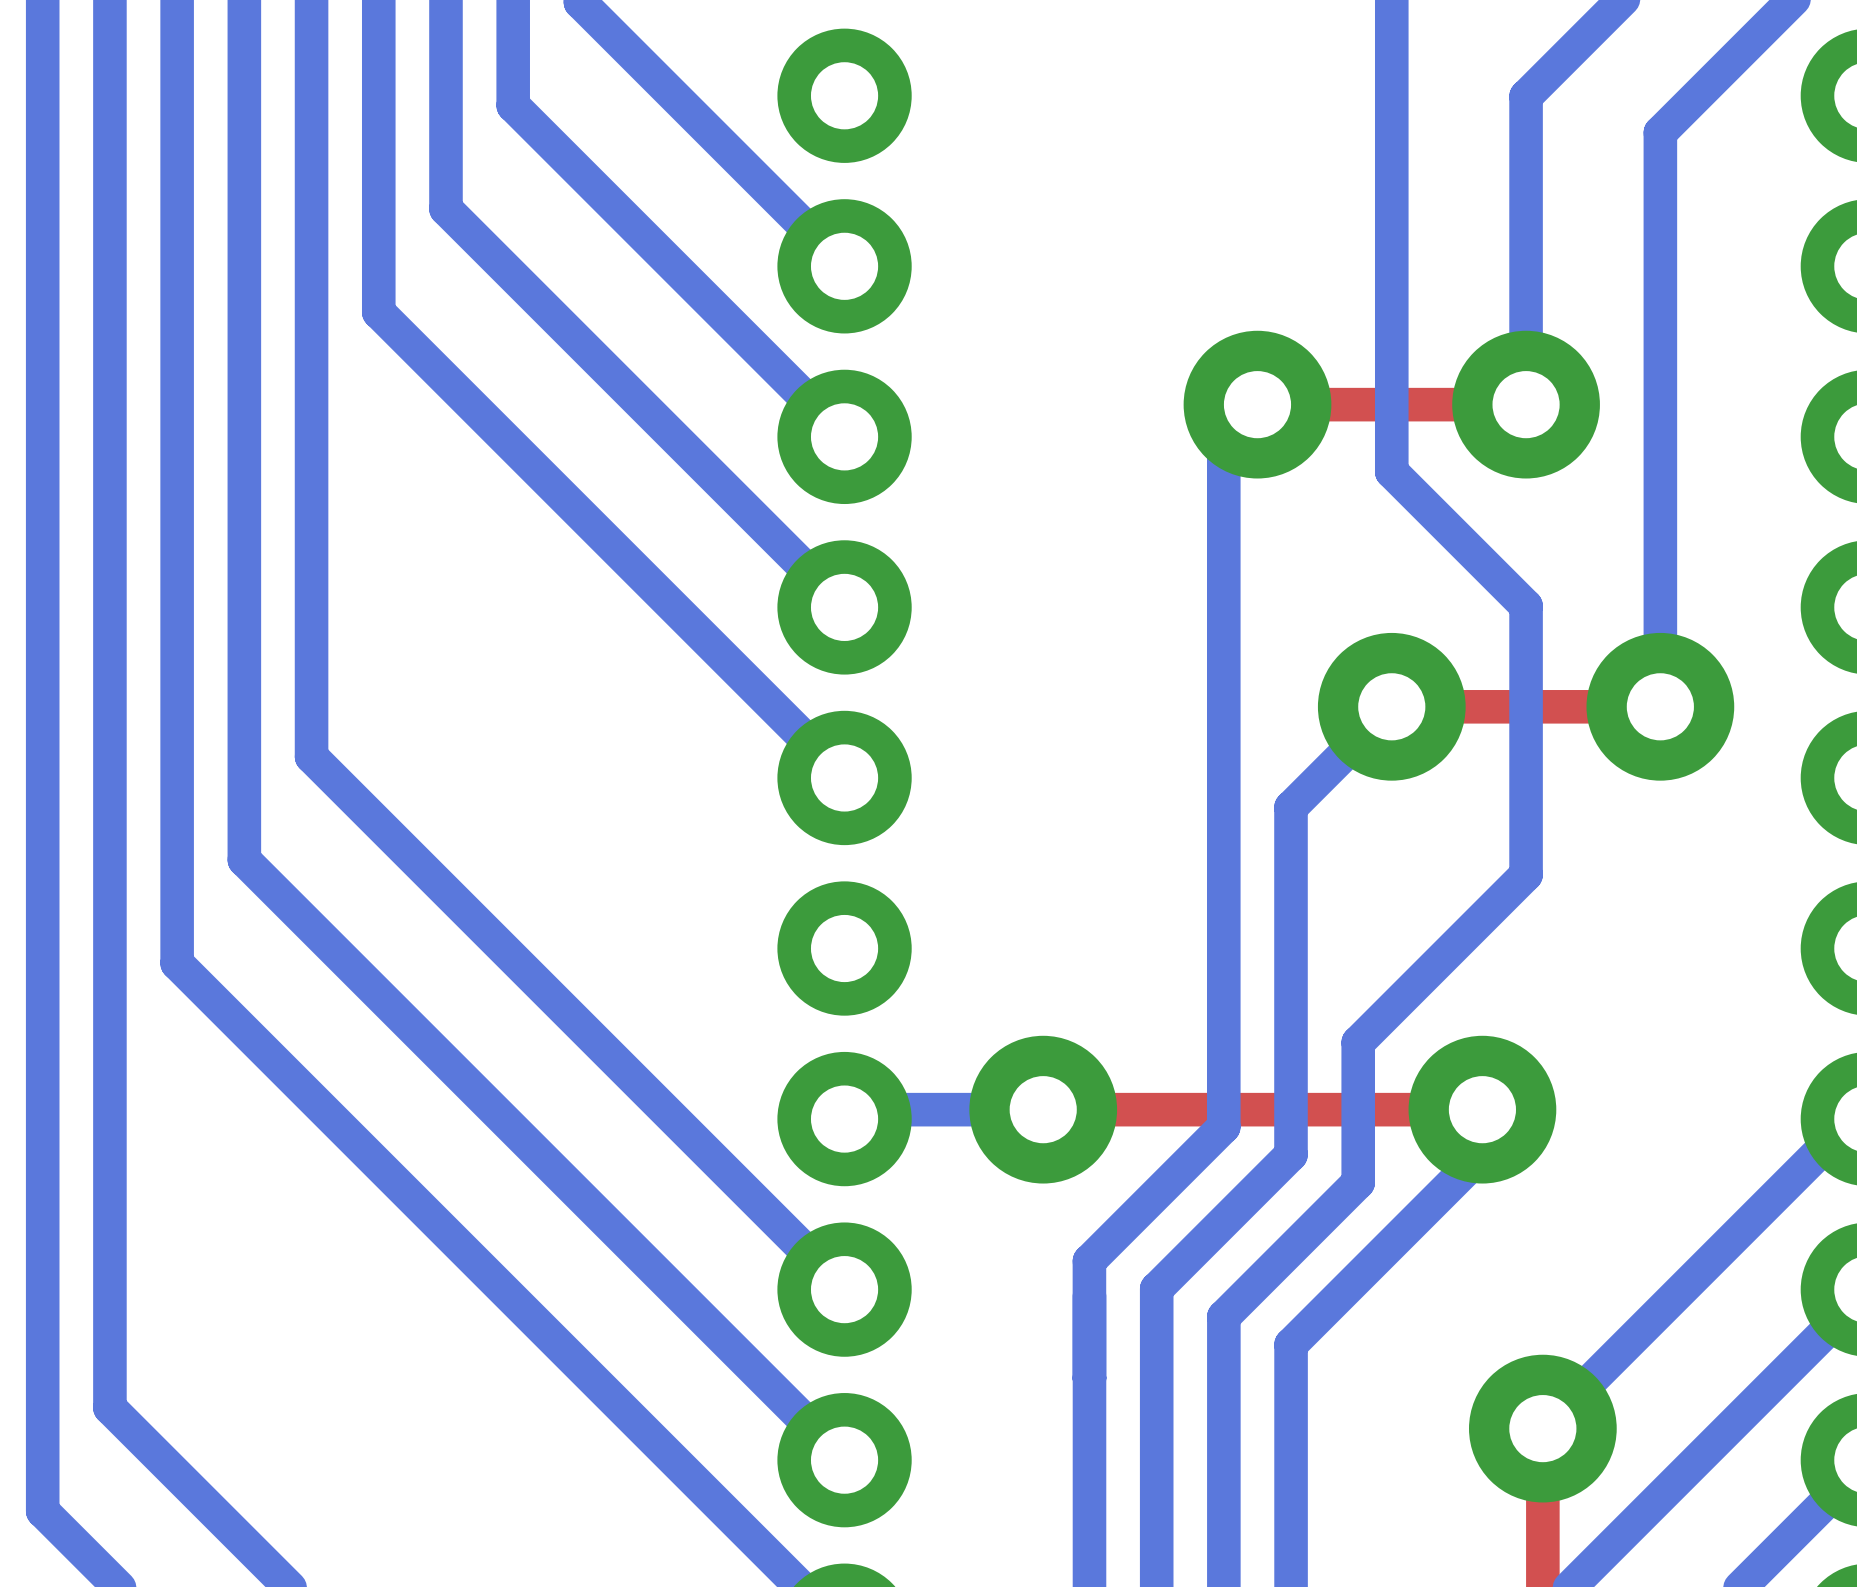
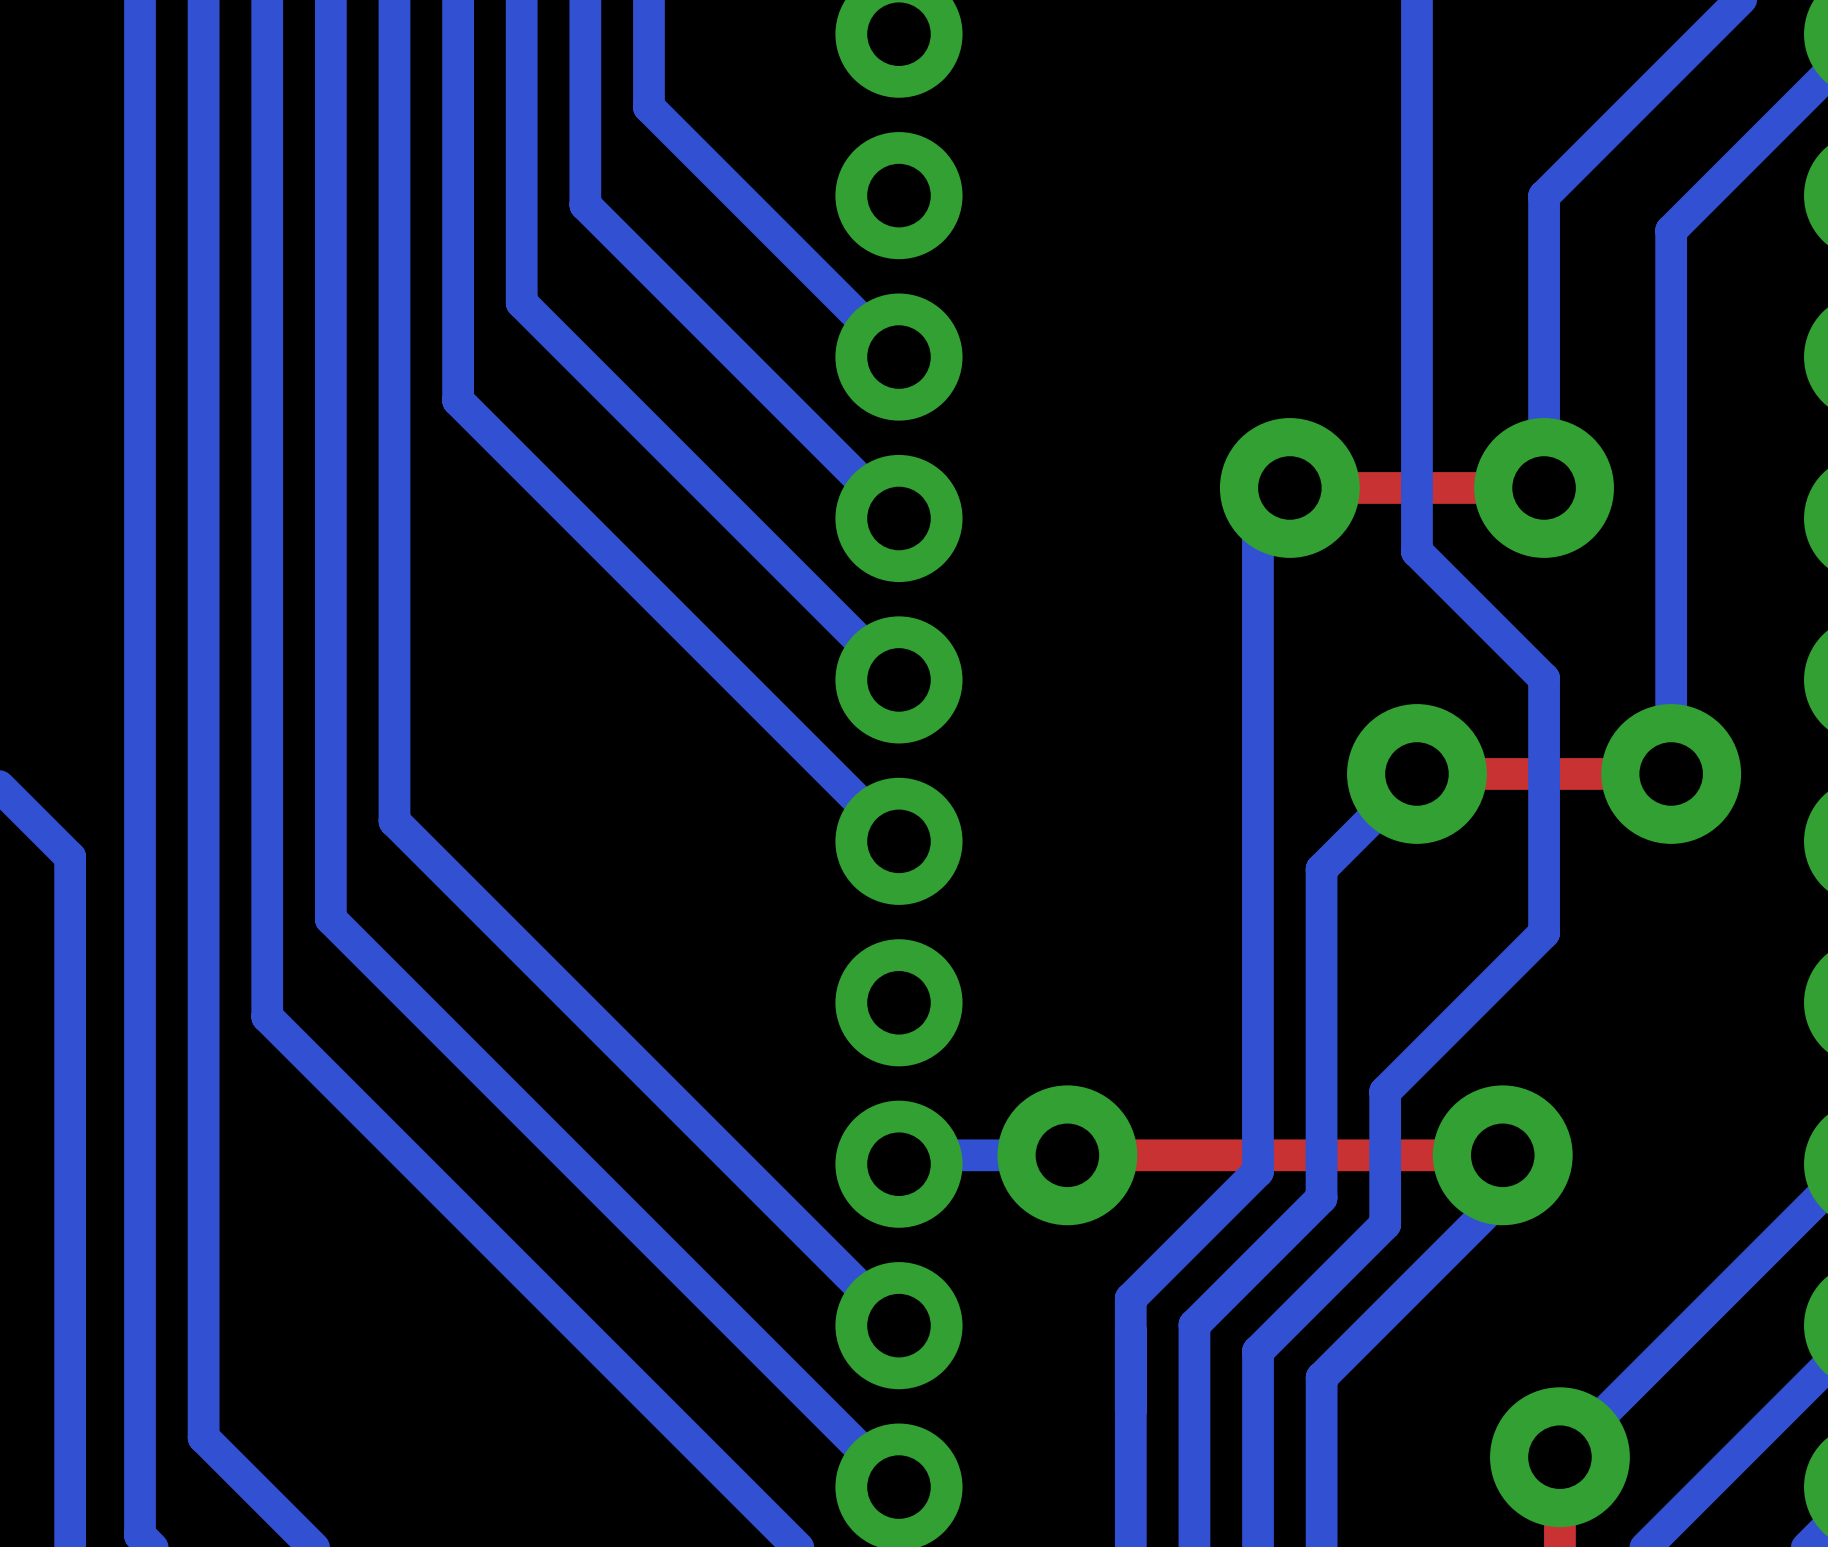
via position: (1043, 1109) -> (1067, 1155)

